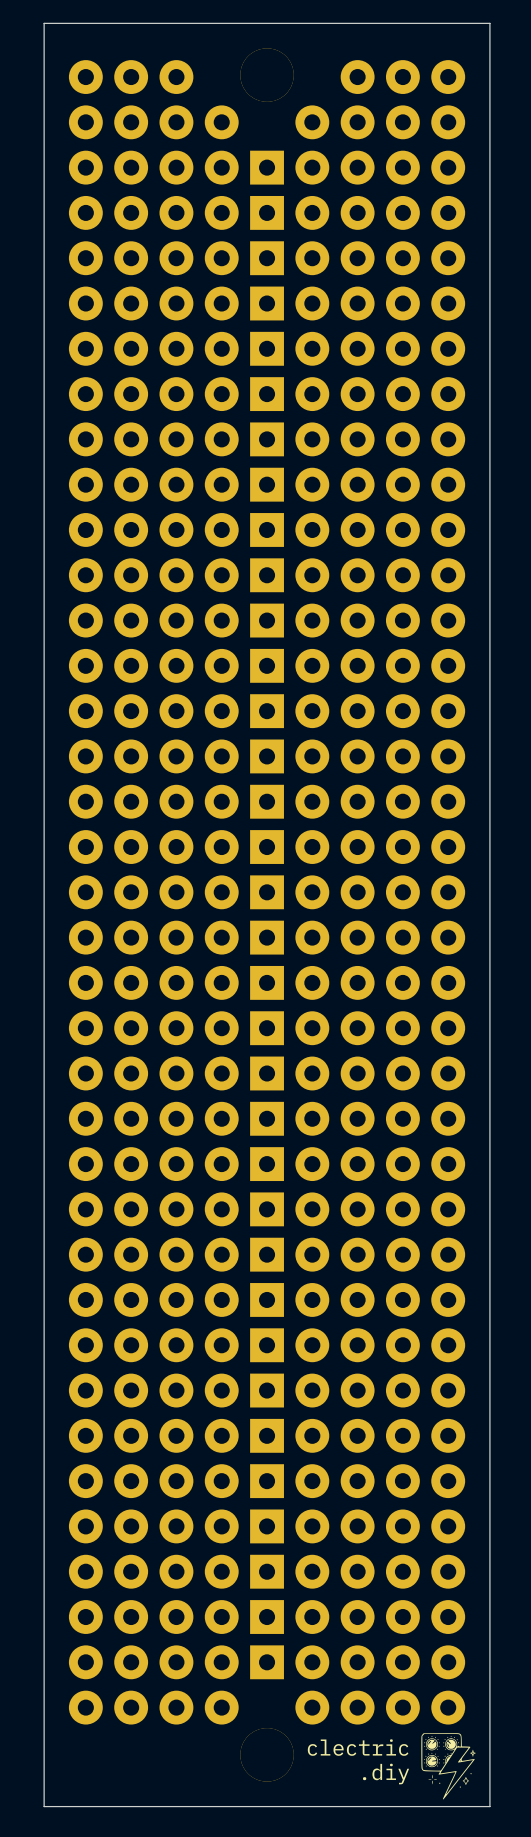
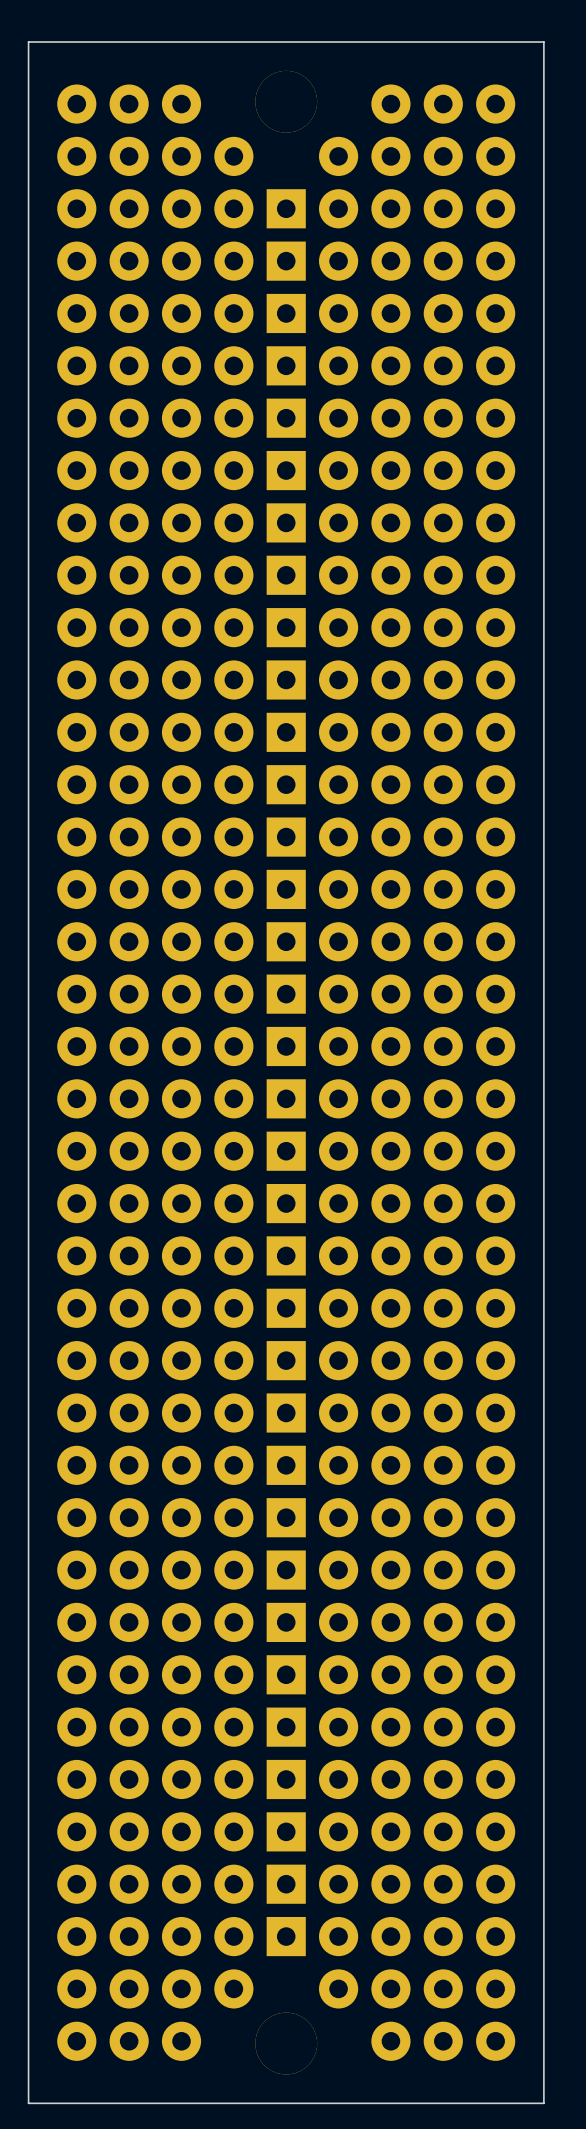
drawing: [421, 1733, 476, 1800] -> none
text: clectric (358, 1747) -> none
part: none -> (76, 2041)
part: none -> (129, 2041)
part: none -> (181, 2041)
part: none -> (390, 2041)
part: none -> (443, 2041)
part: none -> (495, 2041)
text: .diy (386, 1774) -> none

